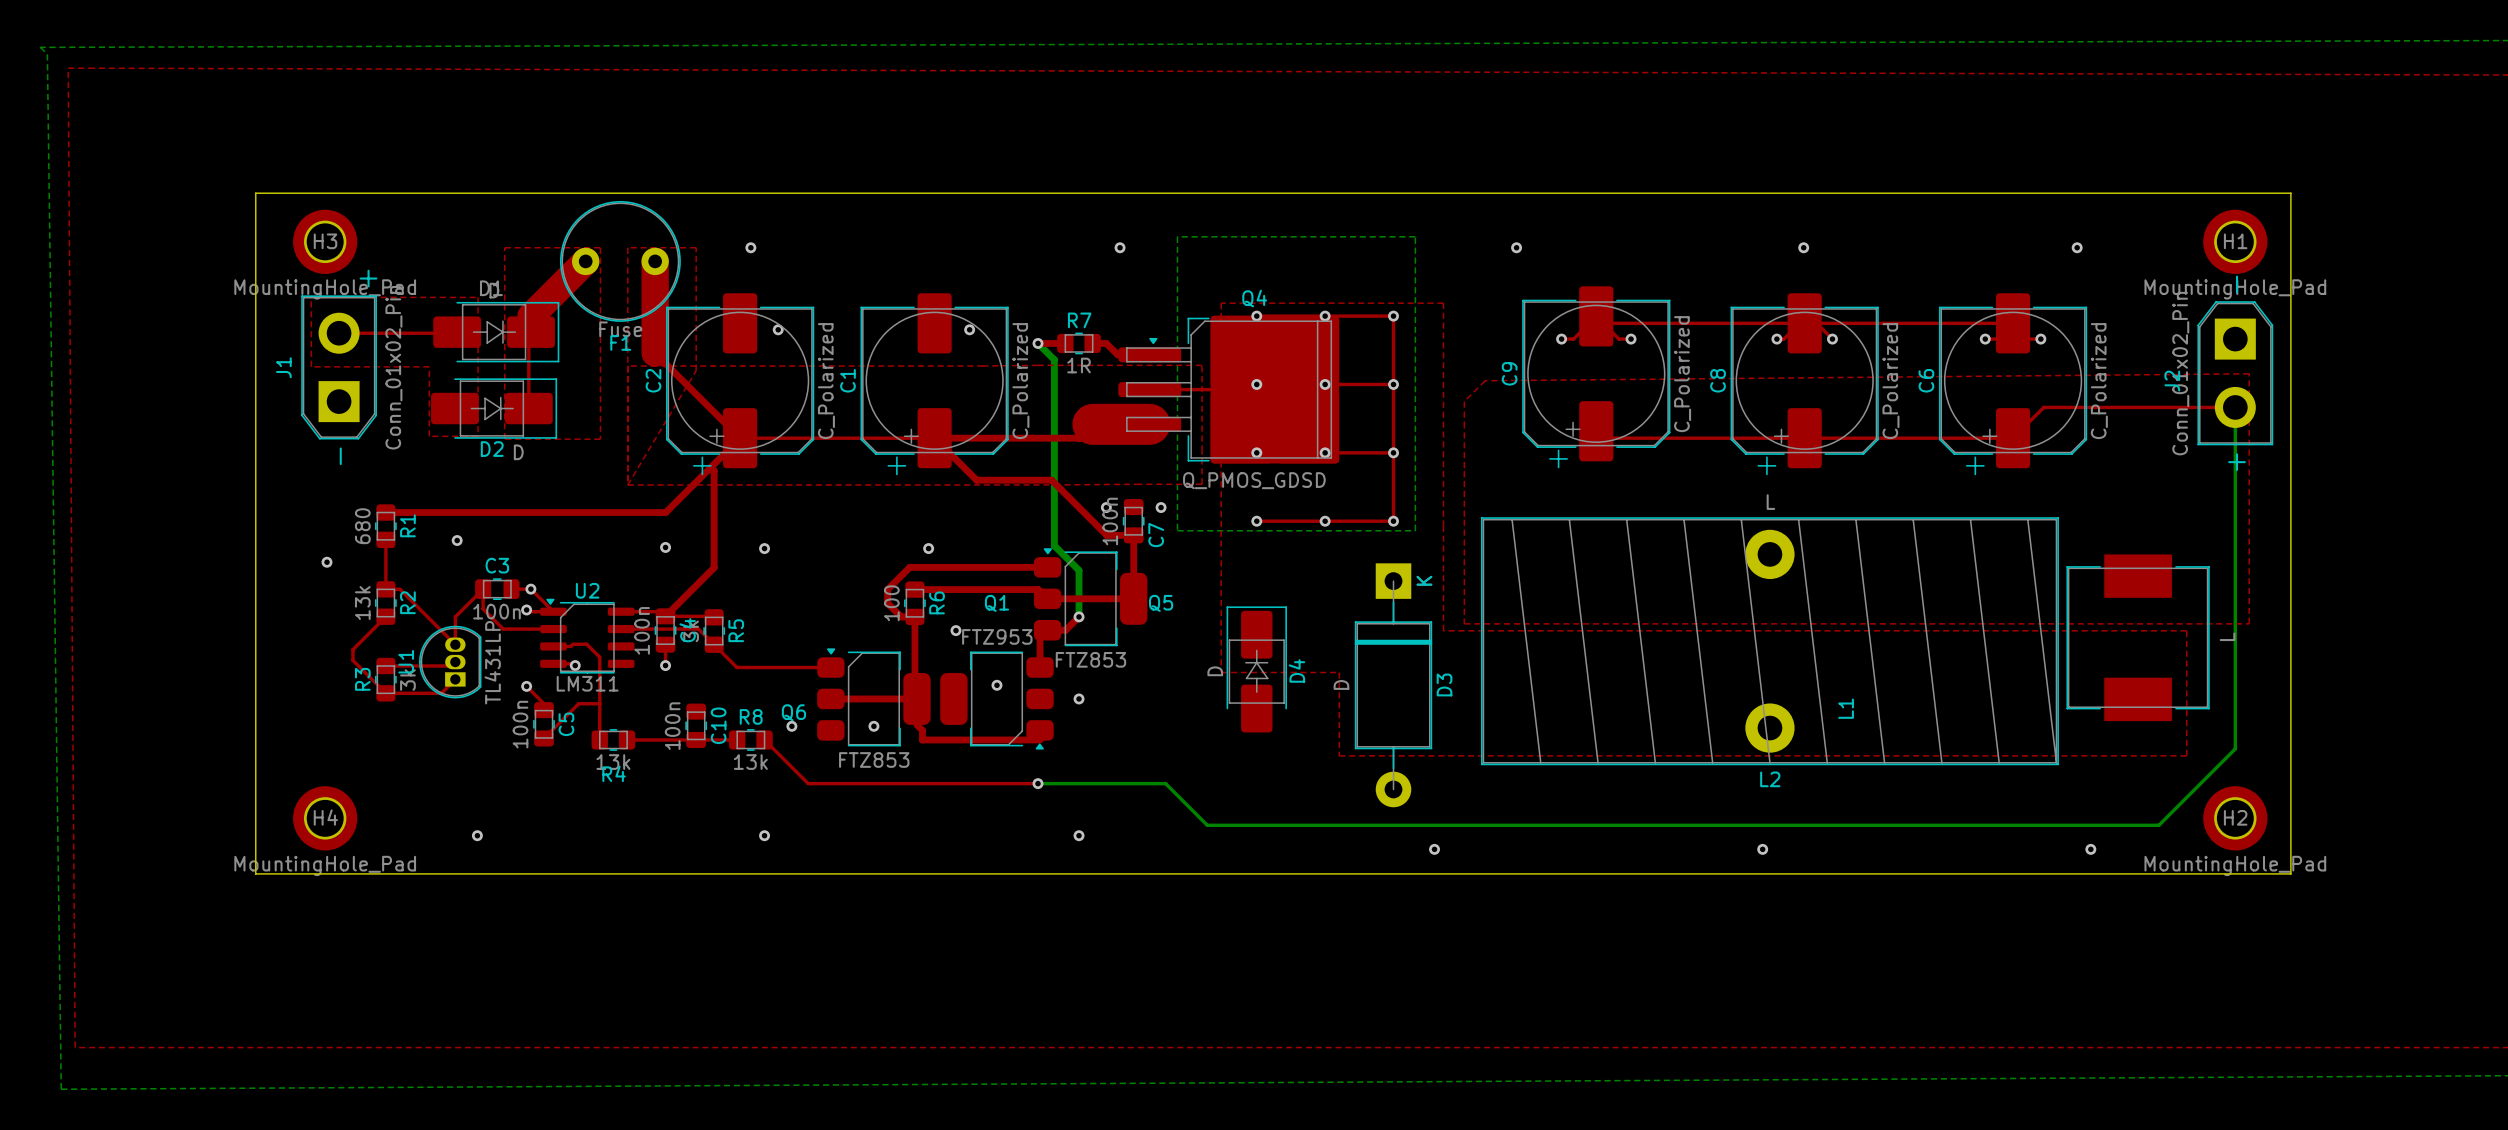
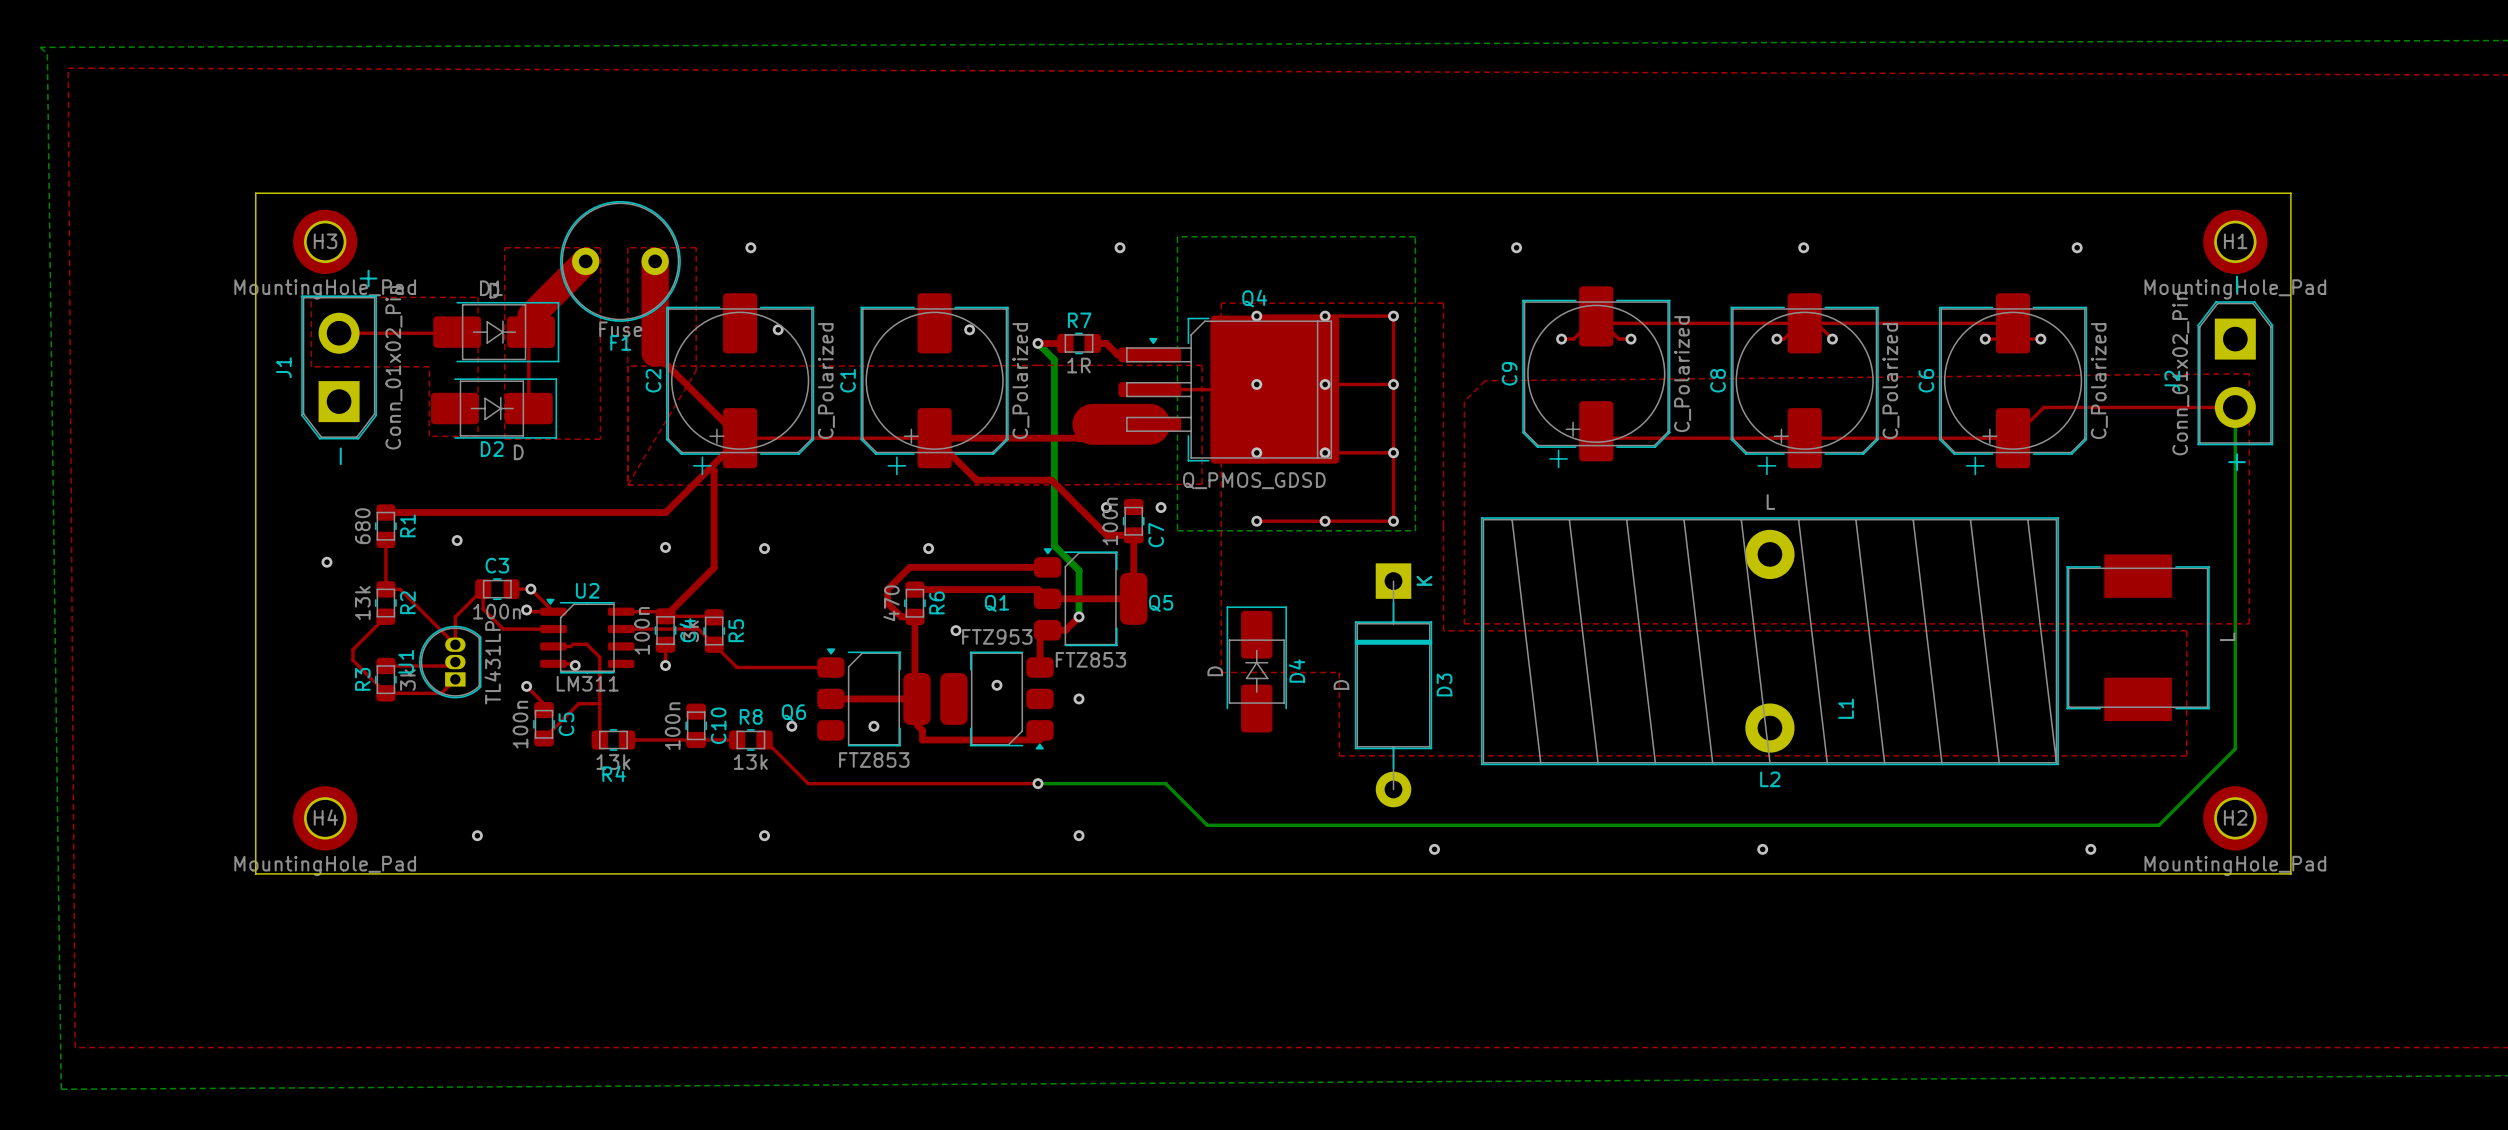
R6 value: 100 (891, 603) -> 470 (891, 603)

